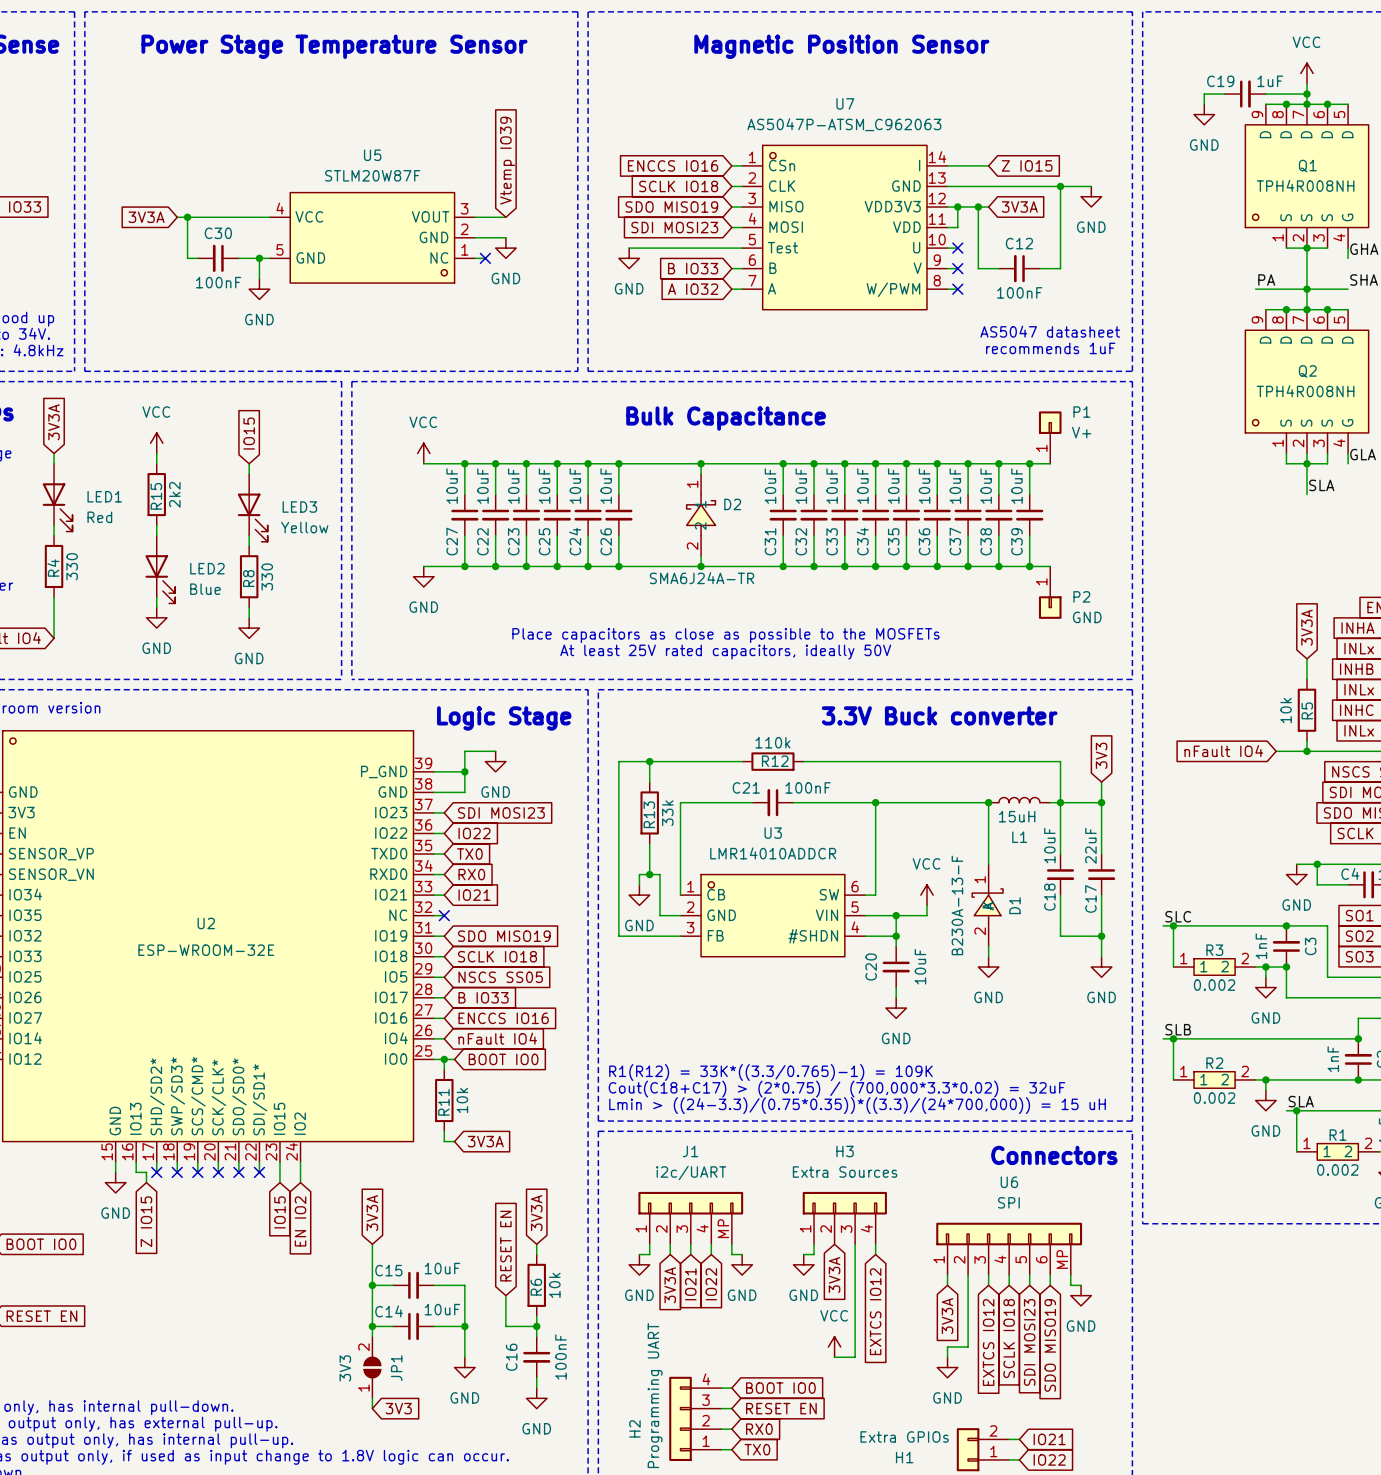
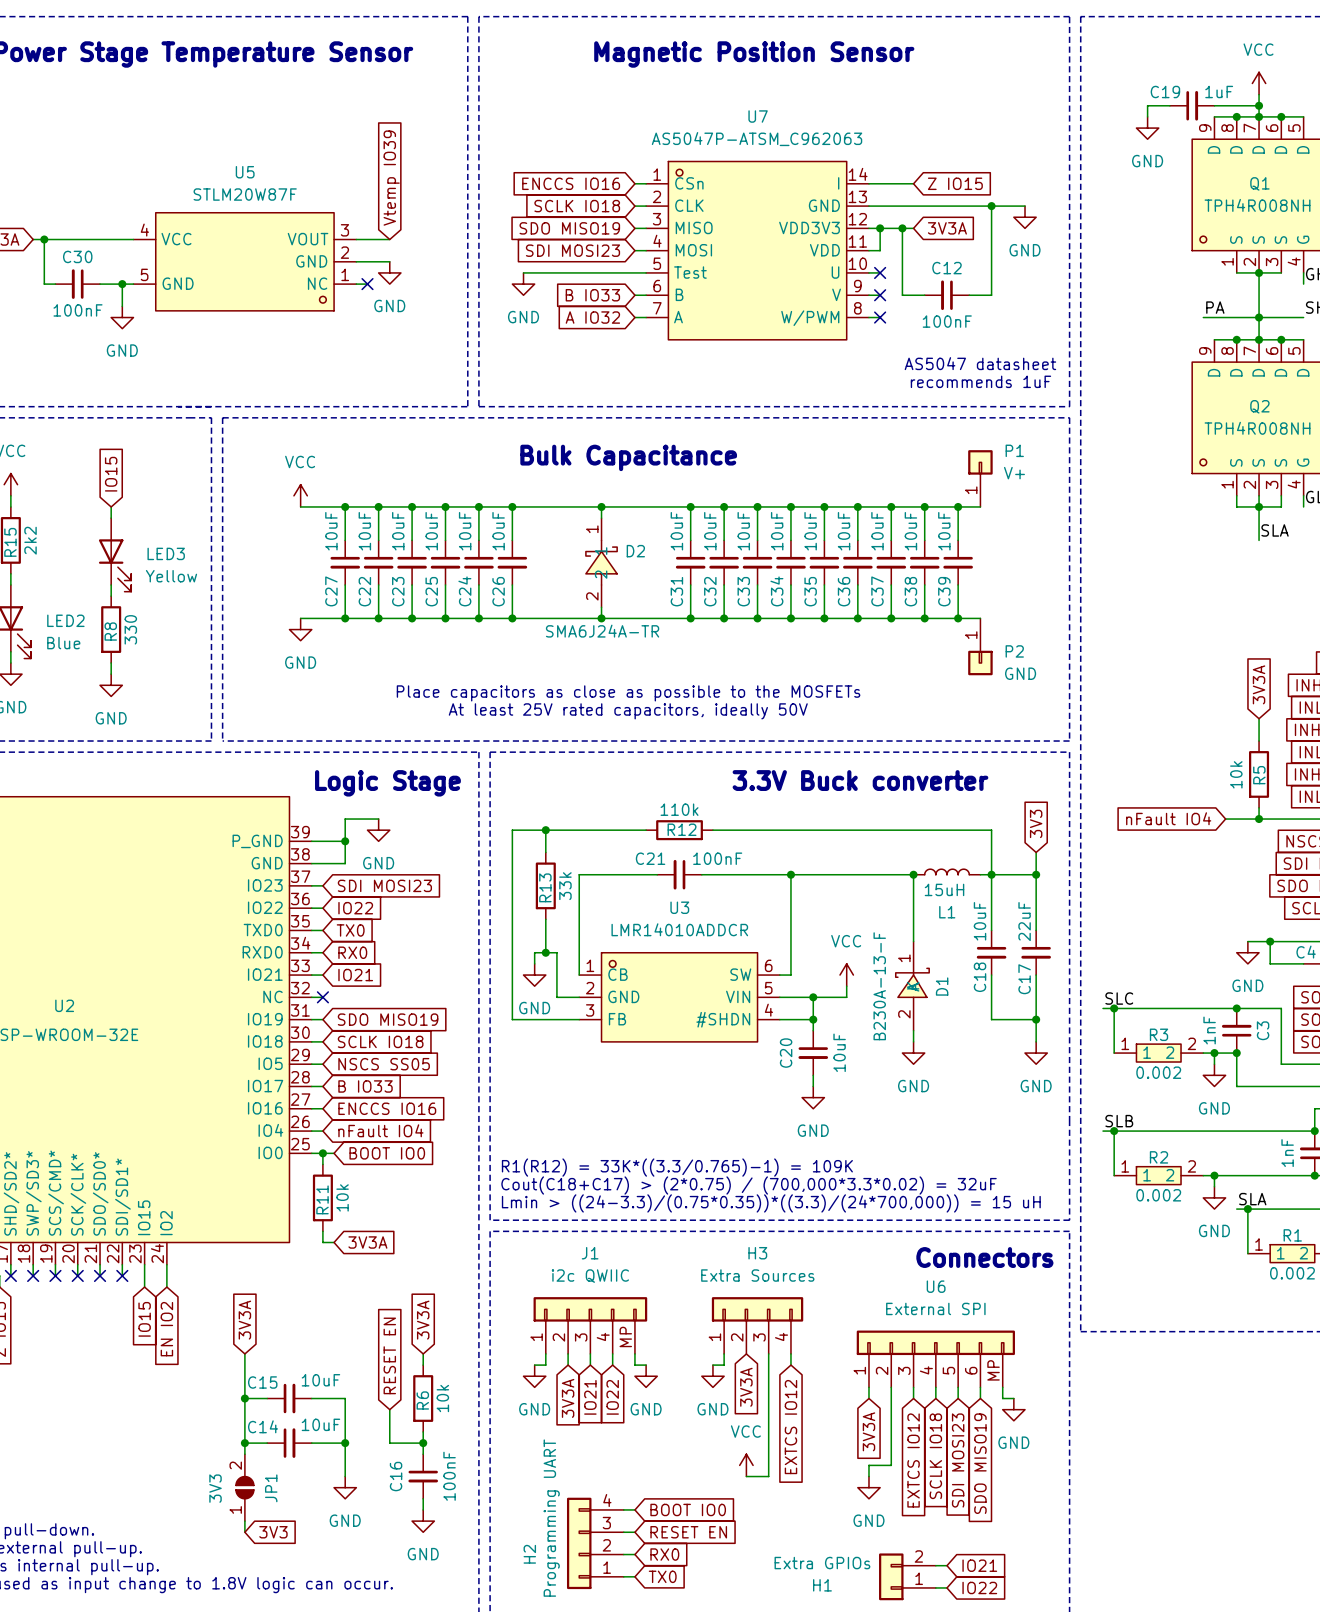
J1 value: i2c/UART (691, 1172) -> i2c QWIIC (590, 1276)
U6 value: SPI (1008, 1202) -> External SPI (935, 1308)

